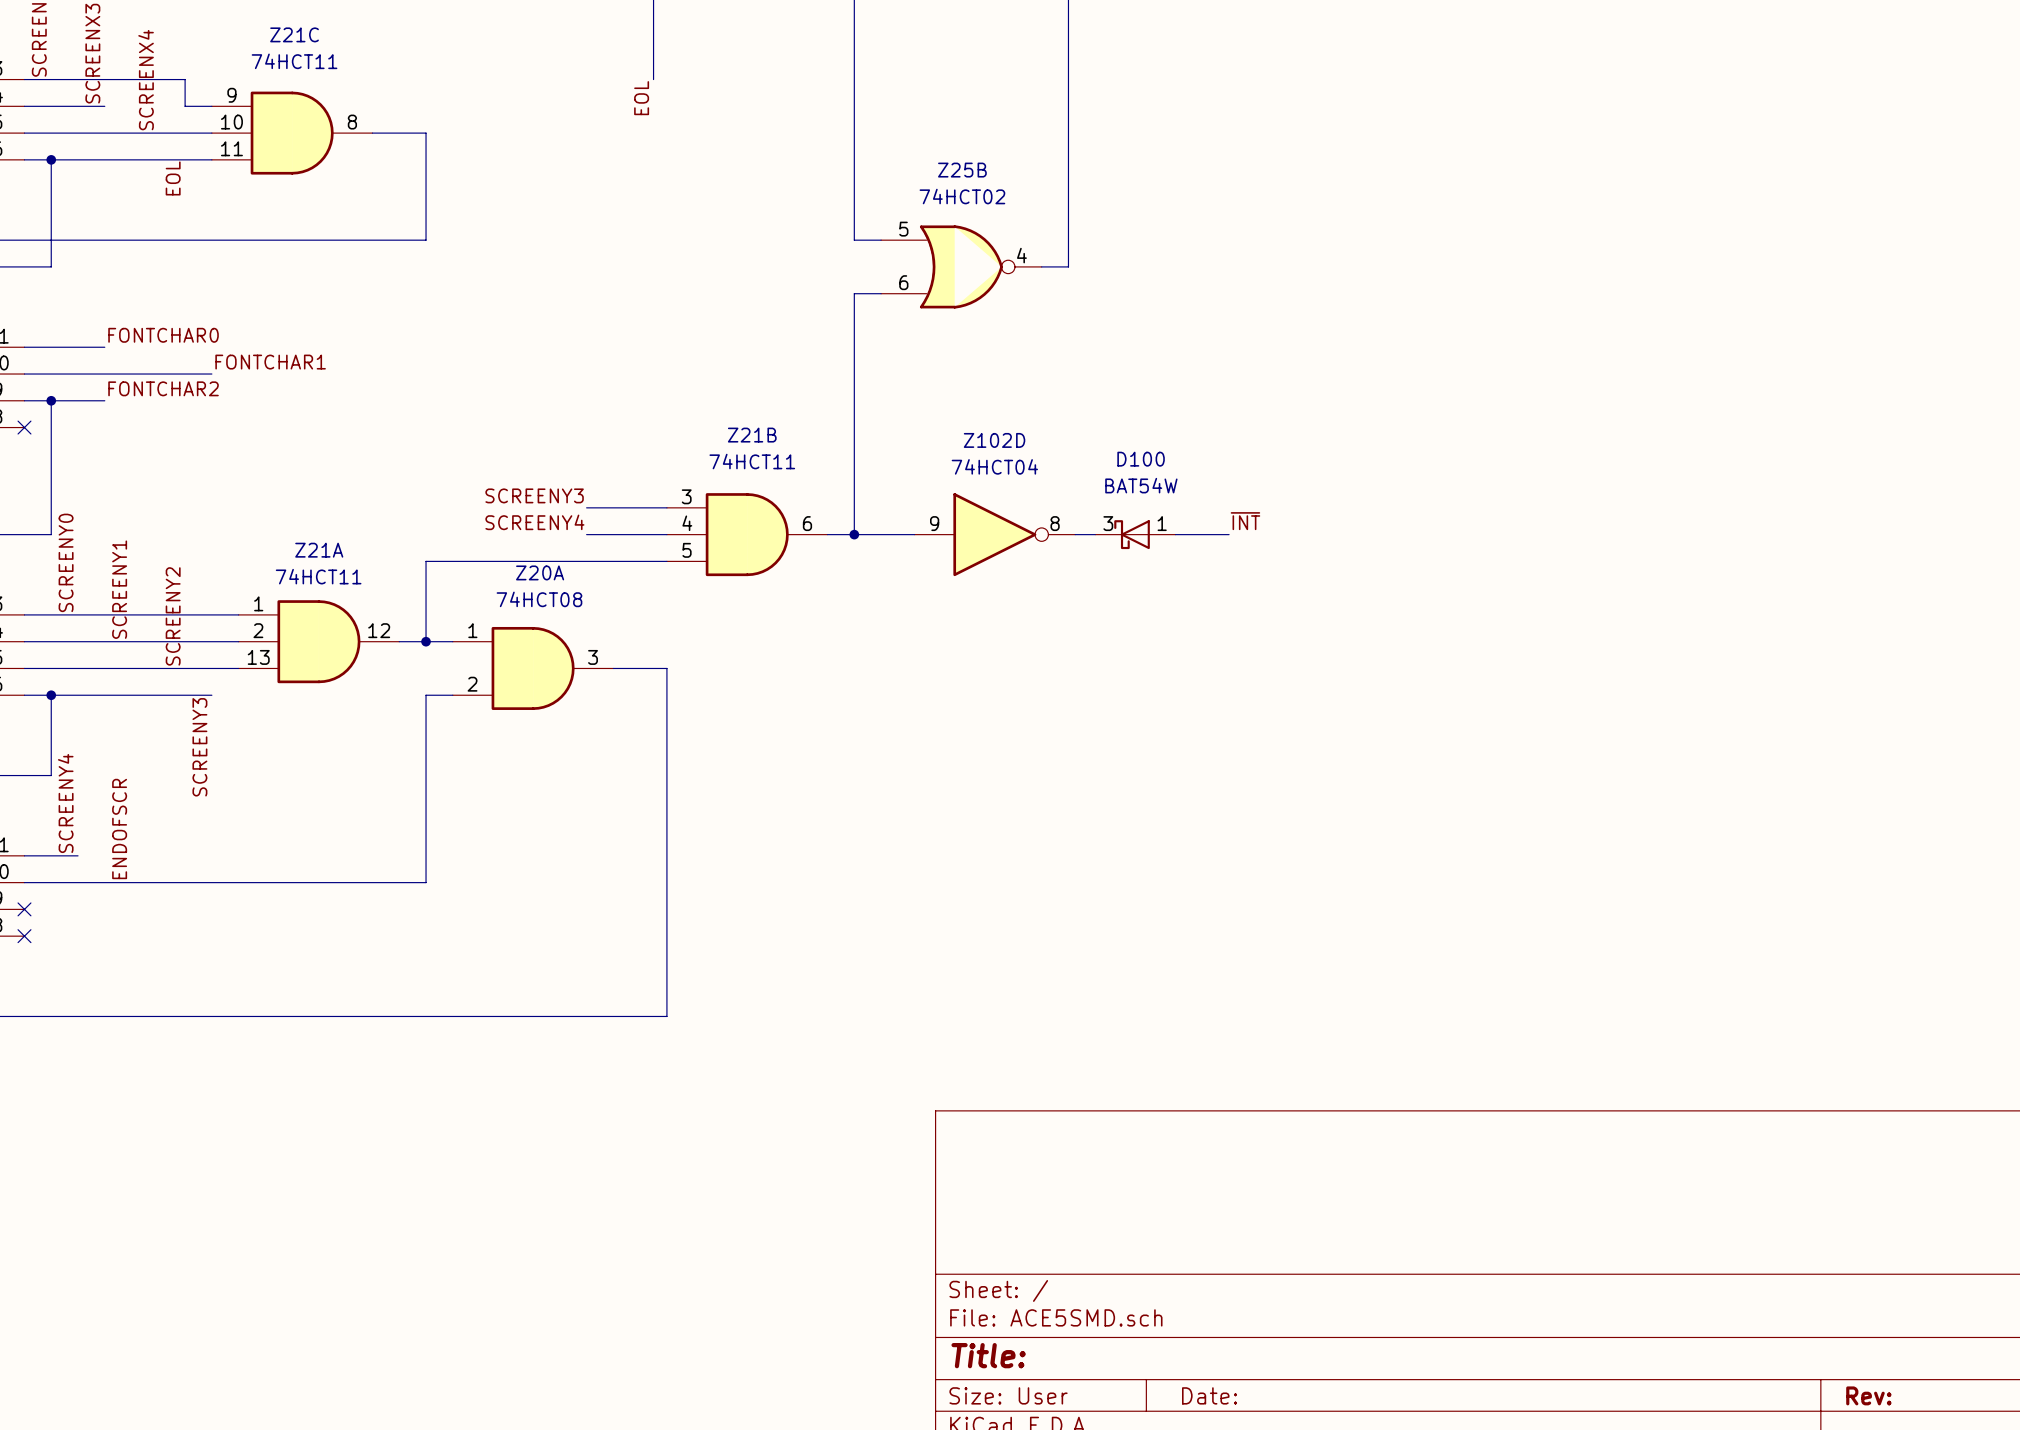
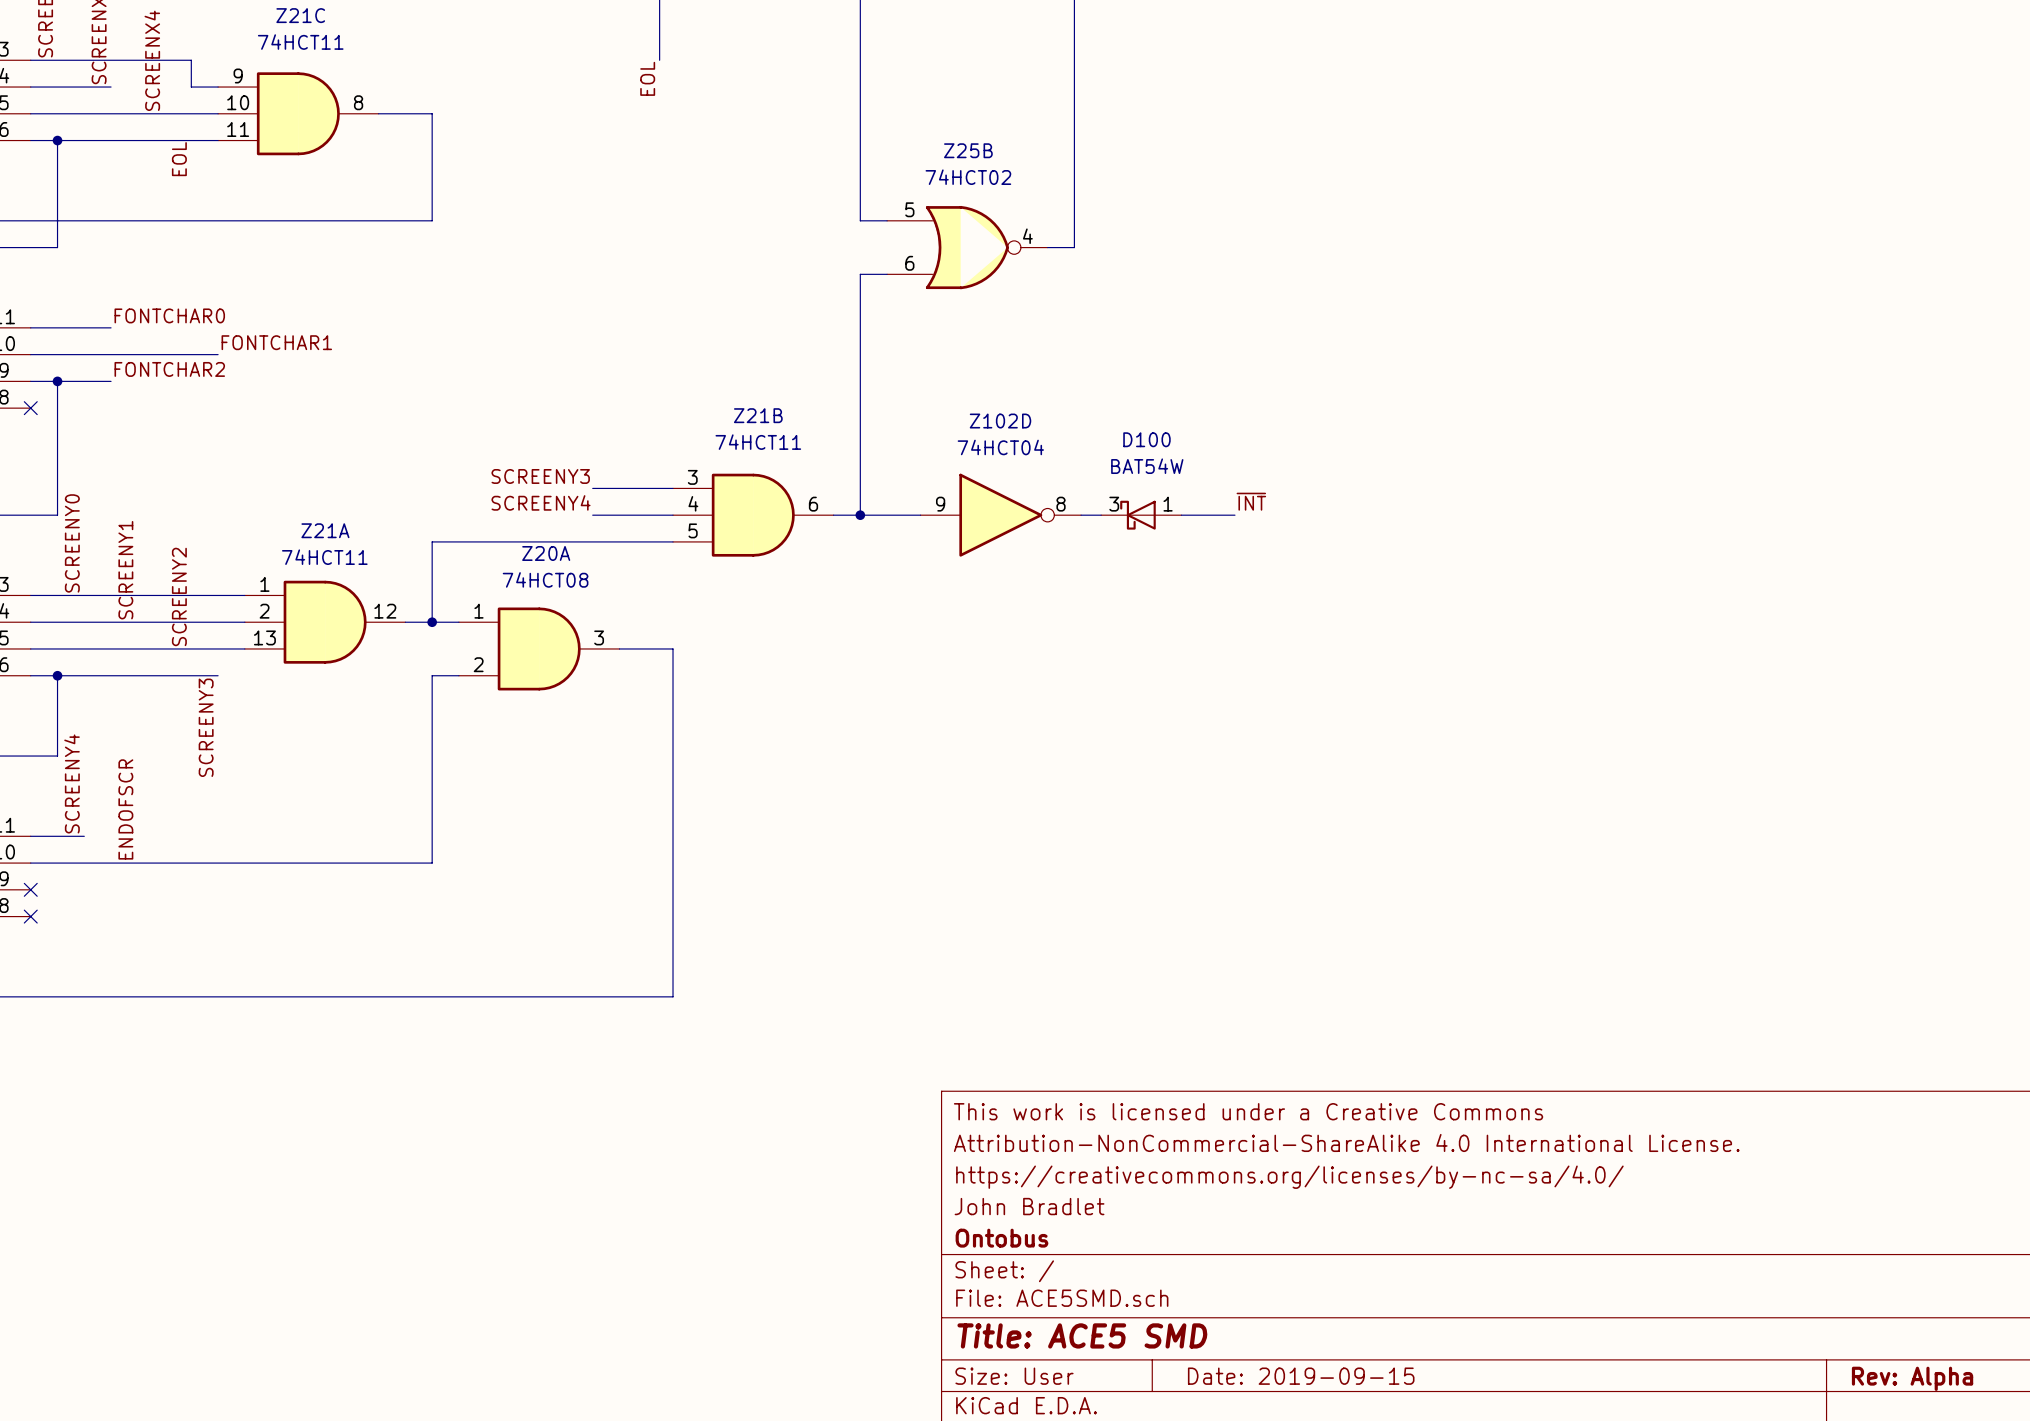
title block: none -> This work is licensed under a Creative Commons (1248, 1111)
title block: none -> Attribution-NonCommercial-ShareAlike 4.0 International License. (1346, 1142)
title block: none -> https://creativecommons.org/licenses/by-nc-sa/4.0/ (1289, 1177)
title block: none -> John Bradlet (1029, 1206)
title block: none -> Ontobus (1001, 1238)
title block: Title: (988, 1355) -> Title: ACE5 SMD (1082, 1335)
title block: Date: (1209, 1395) -> Date: 2019-09-15 (1301, 1376)
title block: Rev: (1868, 1395) -> Rev: Alpha (1912, 1378)

